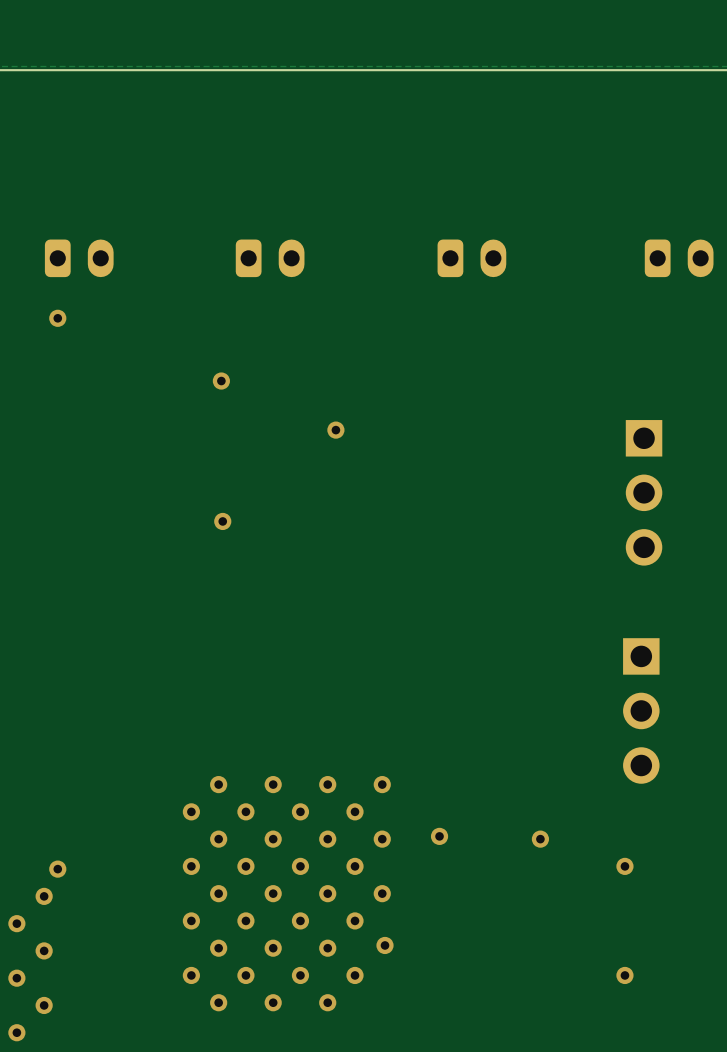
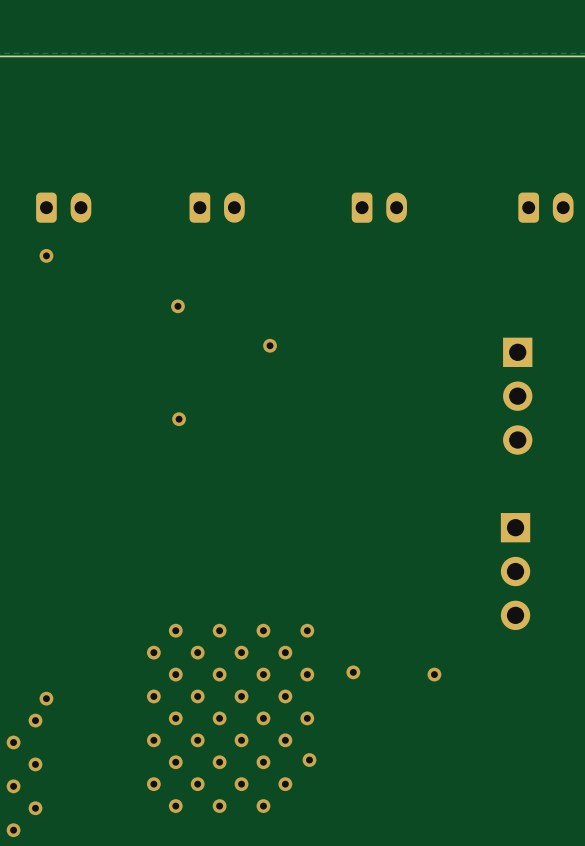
via: (624, 866) -> none
via: (624, 975) -> none

